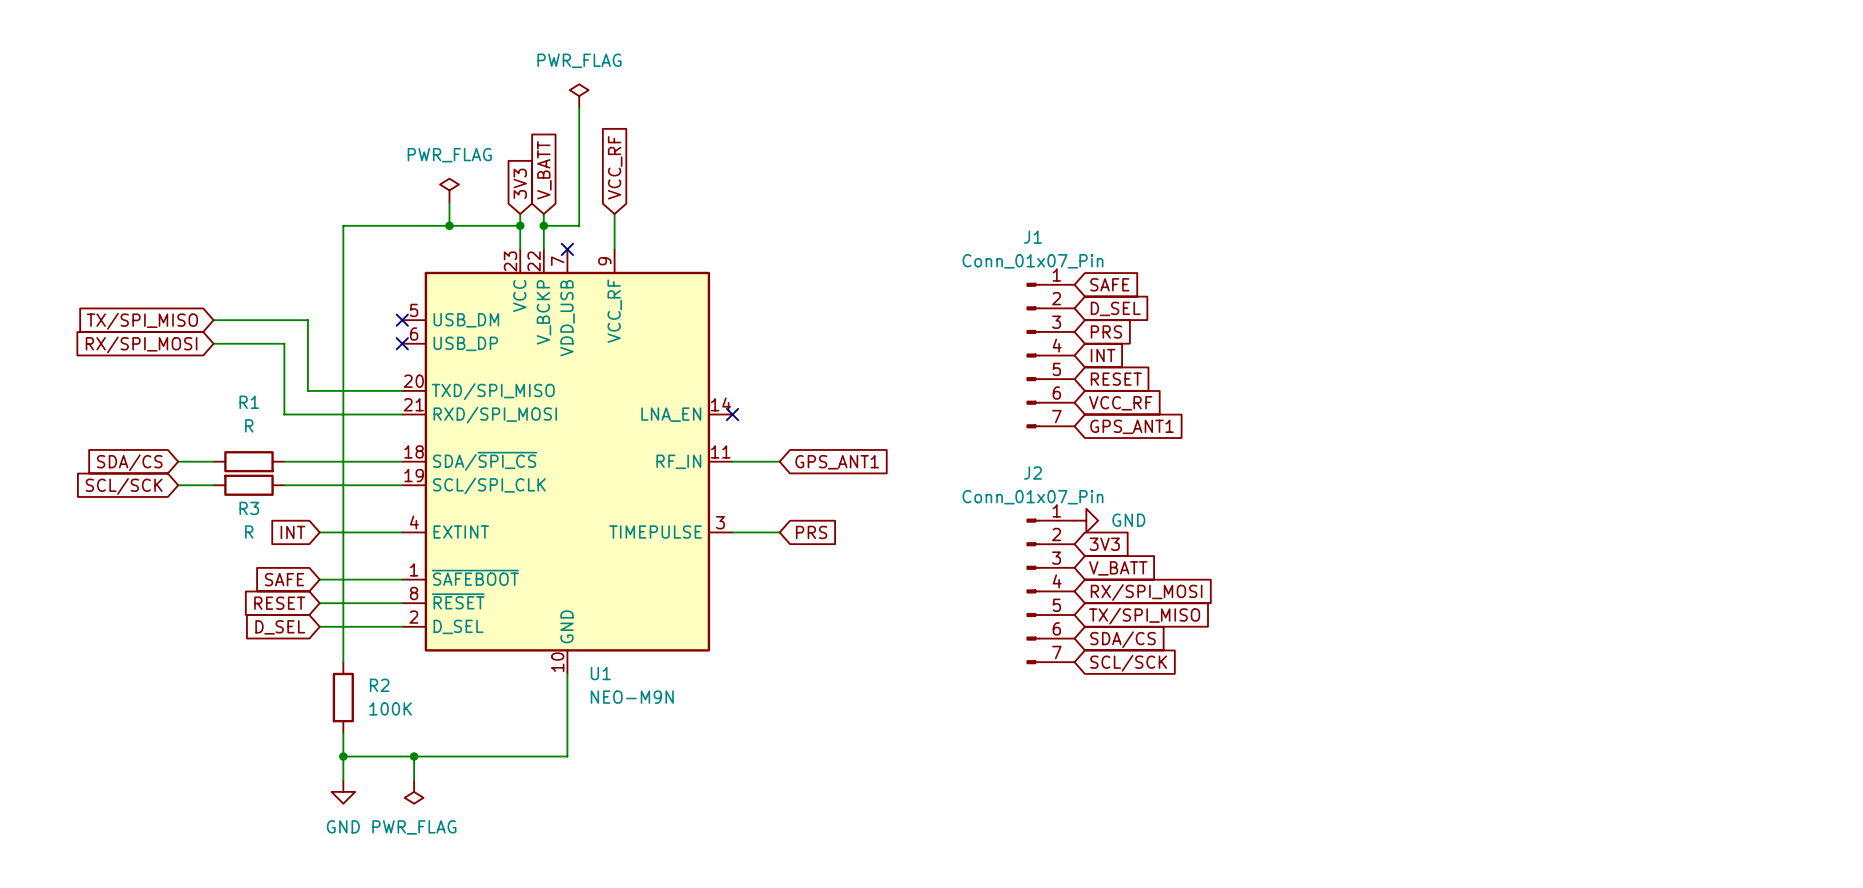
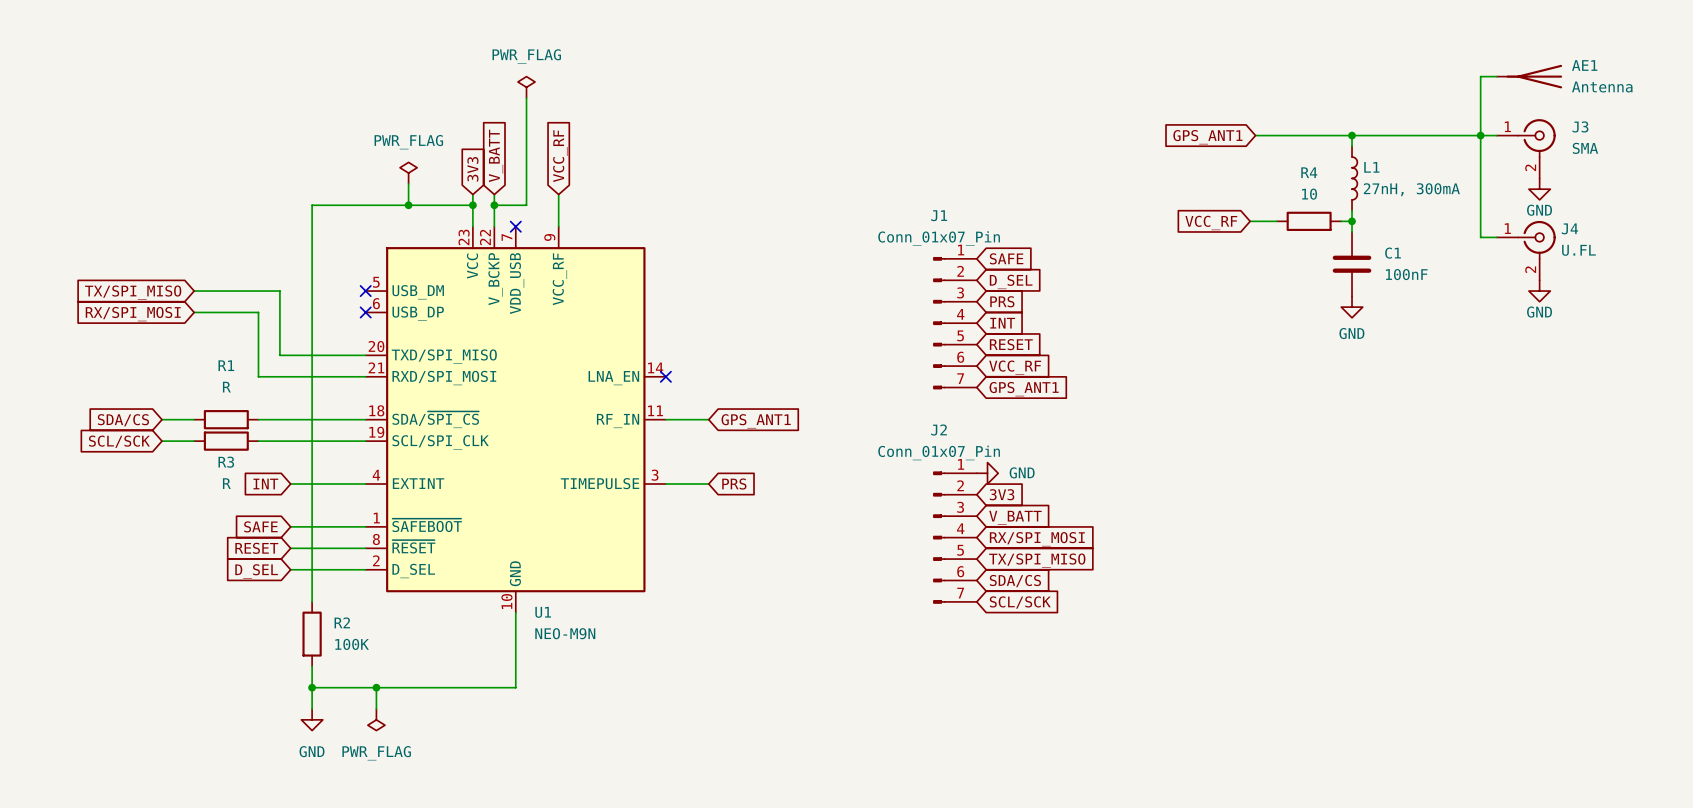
wire: none -> (1496, 76) (1480, 76) (1480, 237) (1496, 237)
AE1: none -> Antenna (1529, 76)
global label: none -> GPS_ANT1 (1207, 137)
wire: none -> (1255, 135) (1496, 135)
wire: none -> (1352, 135) (1352, 146)
junction: none -> (1352, 135)
junction: none -> (1480, 135)
J3: none -> SMA (1526, 148)
L1: none -> 27nH, 300mA (1354, 178)
power symbol: none -> GND (1539, 189)
wire: none -> (1352, 210) (1352, 232)
wire: none -> (1250, 221) (1276, 221)
R4: none -> 10 (1309, 221)
wire: none -> (1341, 221) (1352, 221)
junction: none -> (1352, 221)
global label: none -> VCC_RF (1211, 222)
J4: none -> U.FL (1526, 250)
C1: none -> 100nF (1352, 264)
power symbol: none -> GND (1539, 291)
power symbol: none -> GND (1352, 307)

